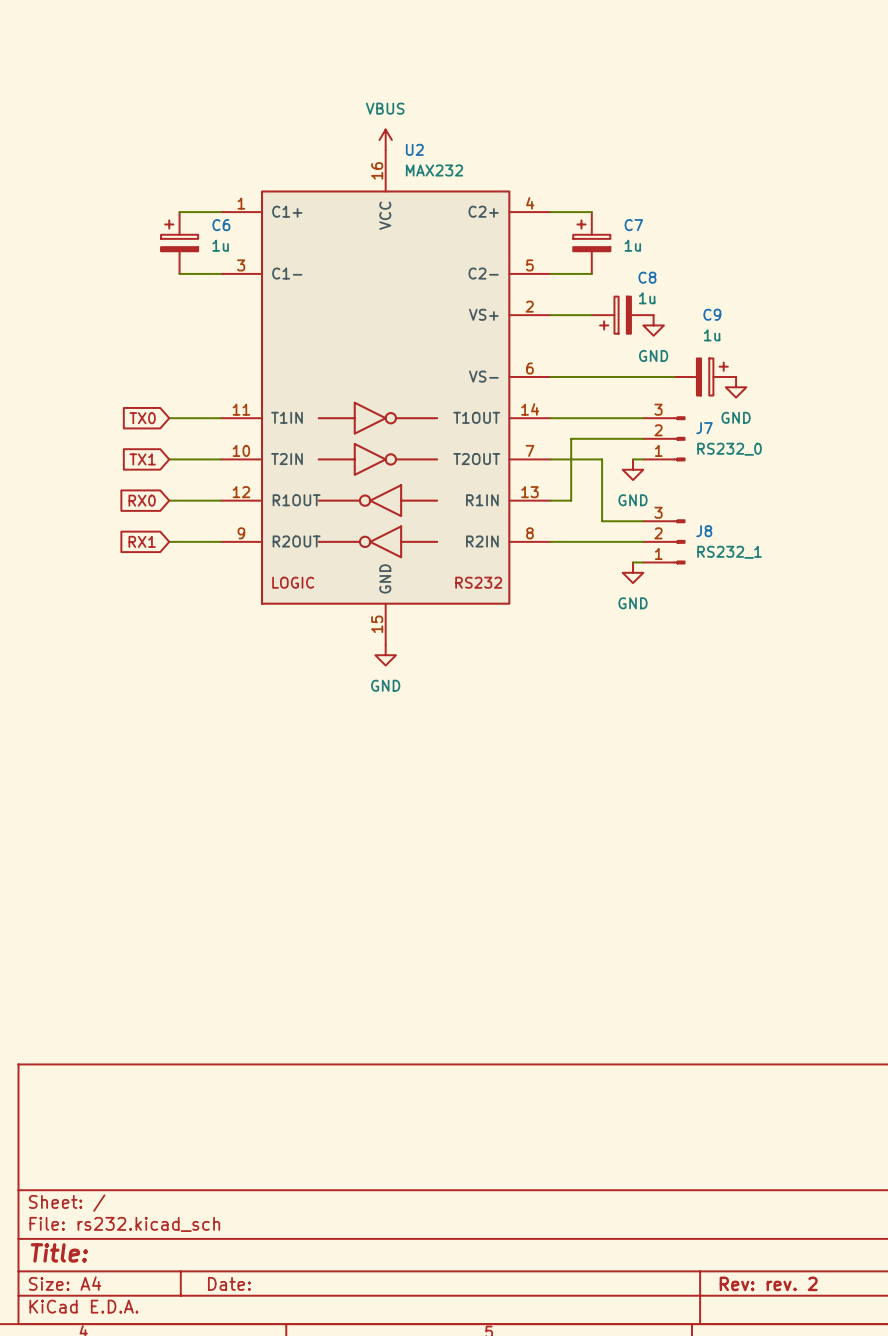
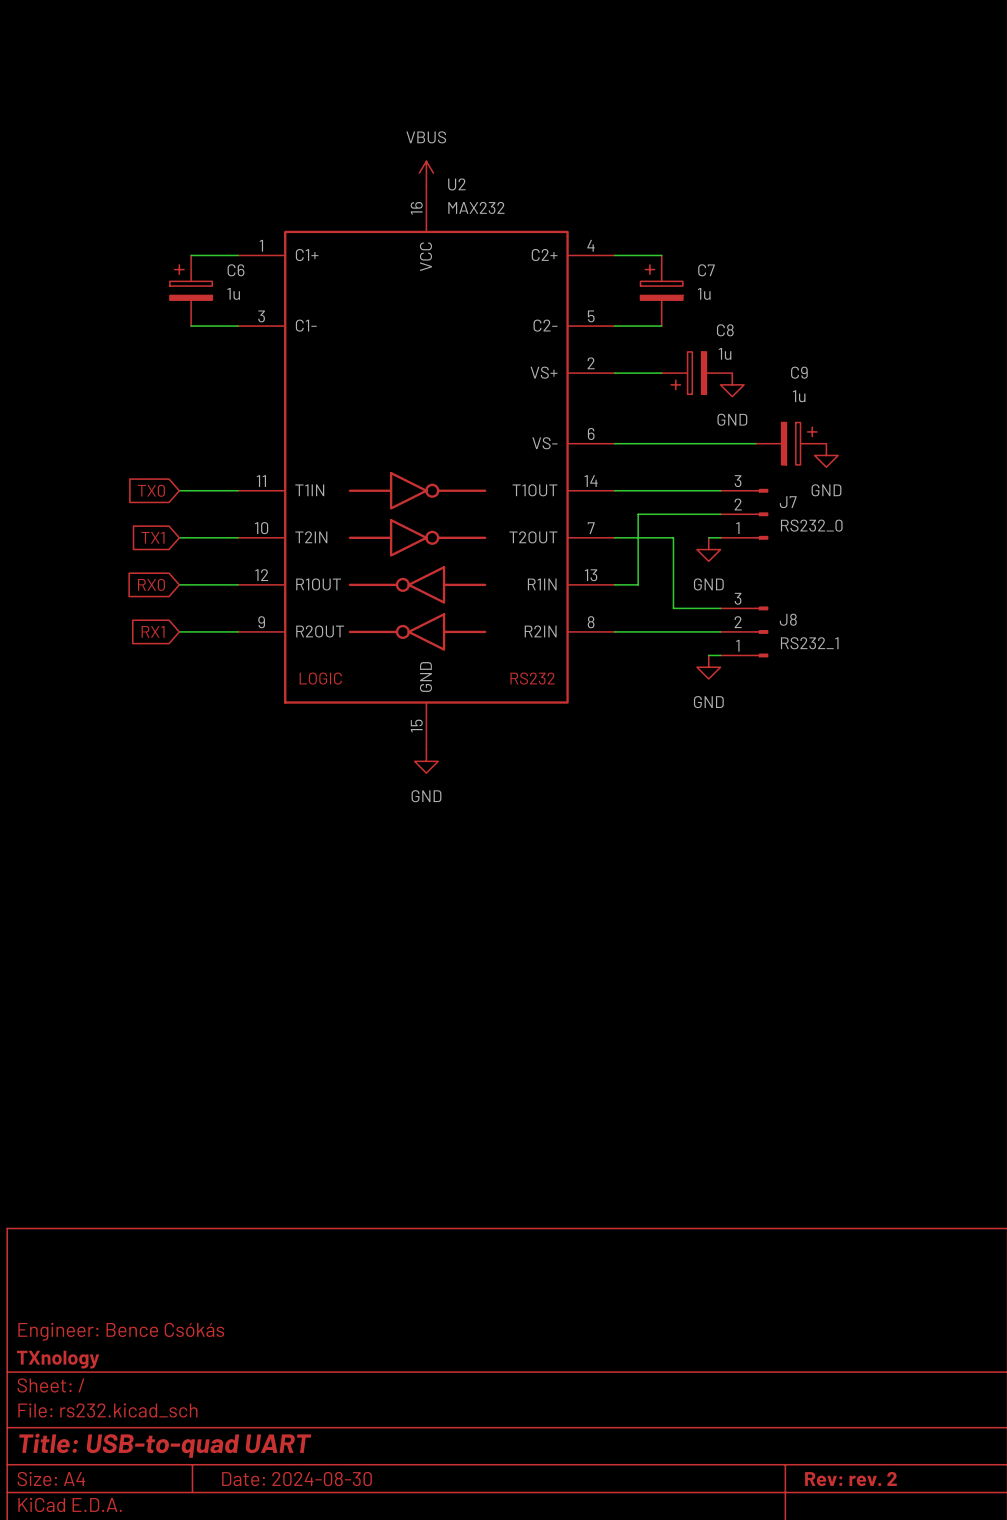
title block: none -> Engineer: Bence Csókás (121, 1331)
title block: none -> TXnology (58, 1359)
title block: Title: (59, 1252) -> Title: USB-to-quad UART (165, 1445)
title block: Date: (229, 1283) -> Date: 2024-08-30 (297, 1479)

